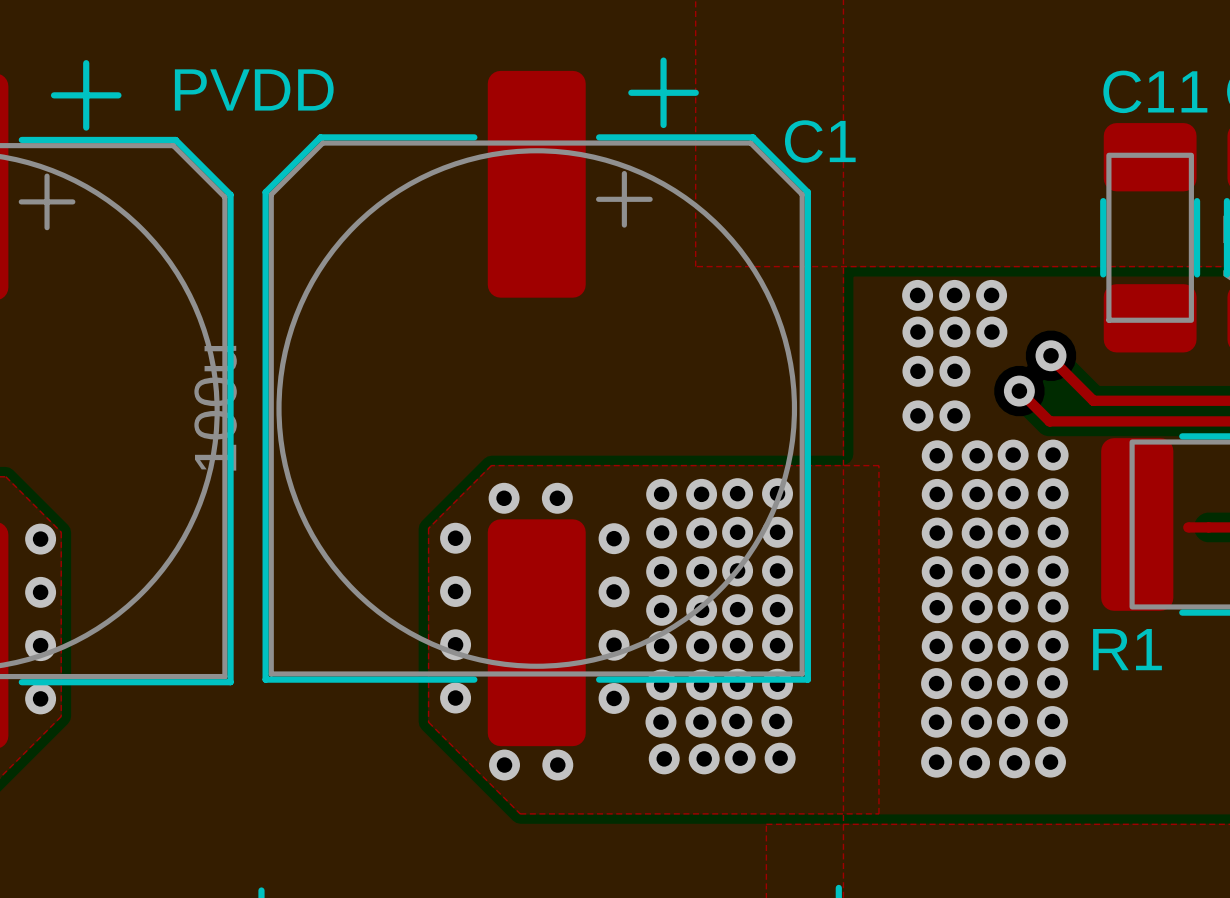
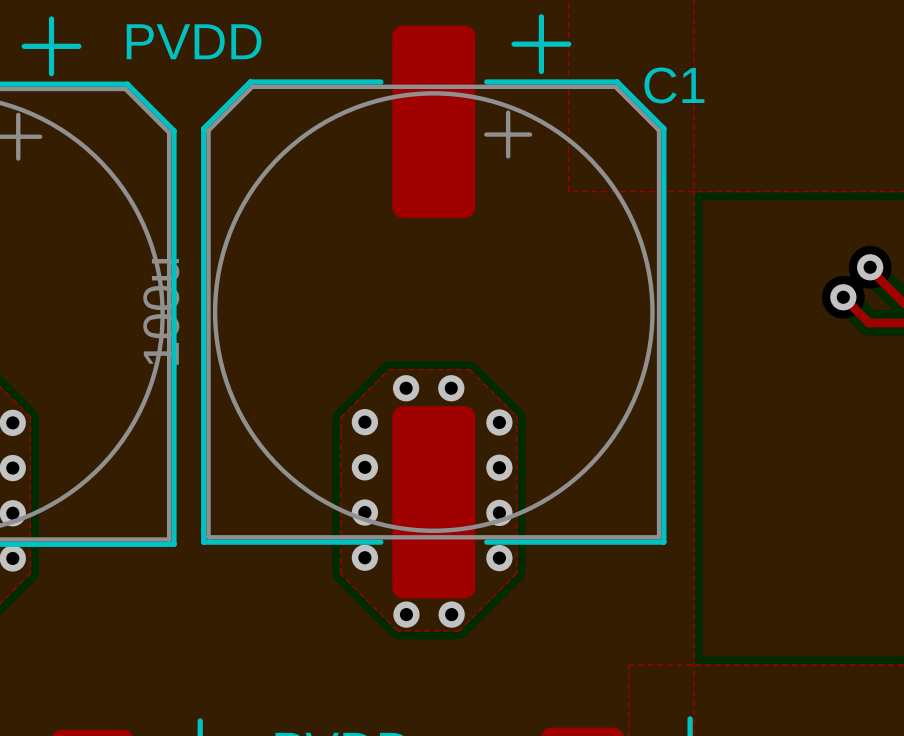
via: (917, 295) -> none
via: (954, 295) -> none
via: (991, 295) -> none
via: (917, 332) -> none
via: (954, 332) -> none
via: (991, 332) -> none
via: (917, 371) -> none
via: (954, 371) -> none
via: (917, 415) -> none
via: (954, 415) -> none
via: (937, 455) -> none
via: (977, 455) -> none
via: (1013, 455) -> none
via: (1053, 455) -> none
top zone outline: (491, 465) (428, 528) (428, 722) (520, 813) (878, 813) (878, 465) (491, 465) -> none
top zone outline: none -> (388, 369) (469, 369) (516, 416) (516, 573) (458, 631) (397, 631) (340, 574) (340, 417) (388, 369)
via: (737, 493) -> none
via: (777, 493) -> none
via: (1013, 493) -> none
via: (1053, 493) -> none
via: (661, 494) -> none
via: (701, 494) -> none
via: (937, 494) -> none
via: (977, 494) -> none
via: (737, 532) -> none
via: (777, 532) -> none
via: (1013, 532) -> none
via: (1053, 532) -> none
via: (661, 533) -> none
via: (701, 533) -> none
via: (937, 533) -> none
via: (977, 533) -> none
via: (737, 570) -> none
via: (777, 570) -> none
via: (661, 571) -> none
via: (701, 571) -> none
via: (937, 571) -> none
via: (977, 571) -> none
via: (1013, 571) -> none
via: (1053, 571) -> none
via: (937, 607) -> none
via: (977, 607) -> none
via: (1013, 607) -> none
via: (1053, 607) -> none
via: (737, 609) -> none
via: (777, 609) -> none
via: (661, 610) -> none
via: (701, 610) -> none
via: (737, 645) -> none
via: (777, 645) -> none
via: (1013, 645) -> none
via: (1053, 645) -> none
via: (661, 646) -> none
via: (701, 646) -> none
via: (937, 646) -> none
via: (977, 646) -> none
via: (1012, 682) -> none
via: (1052, 682) -> none
via: (936, 683) -> none
via: (976, 683) -> none
via: (661, 684) -> none
via: (701, 684) -> none
via: (737, 684) -> none
via: (777, 684) -> none
via: (736, 721) -> none
via: (776, 721) -> none
via: (1012, 721) -> none
via: (1052, 721) -> none
via: (660, 722) -> none
via: (700, 722) -> none
via: (936, 722) -> none
via: (976, 722) -> none
via: (664, 758) -> none
via: (704, 758) -> none
via: (740, 758) -> none
via: (780, 758) -> none
via: (936, 762) -> none
via: (974, 762) -> none
via: (1014, 762) -> none
via: (1050, 762) -> none

